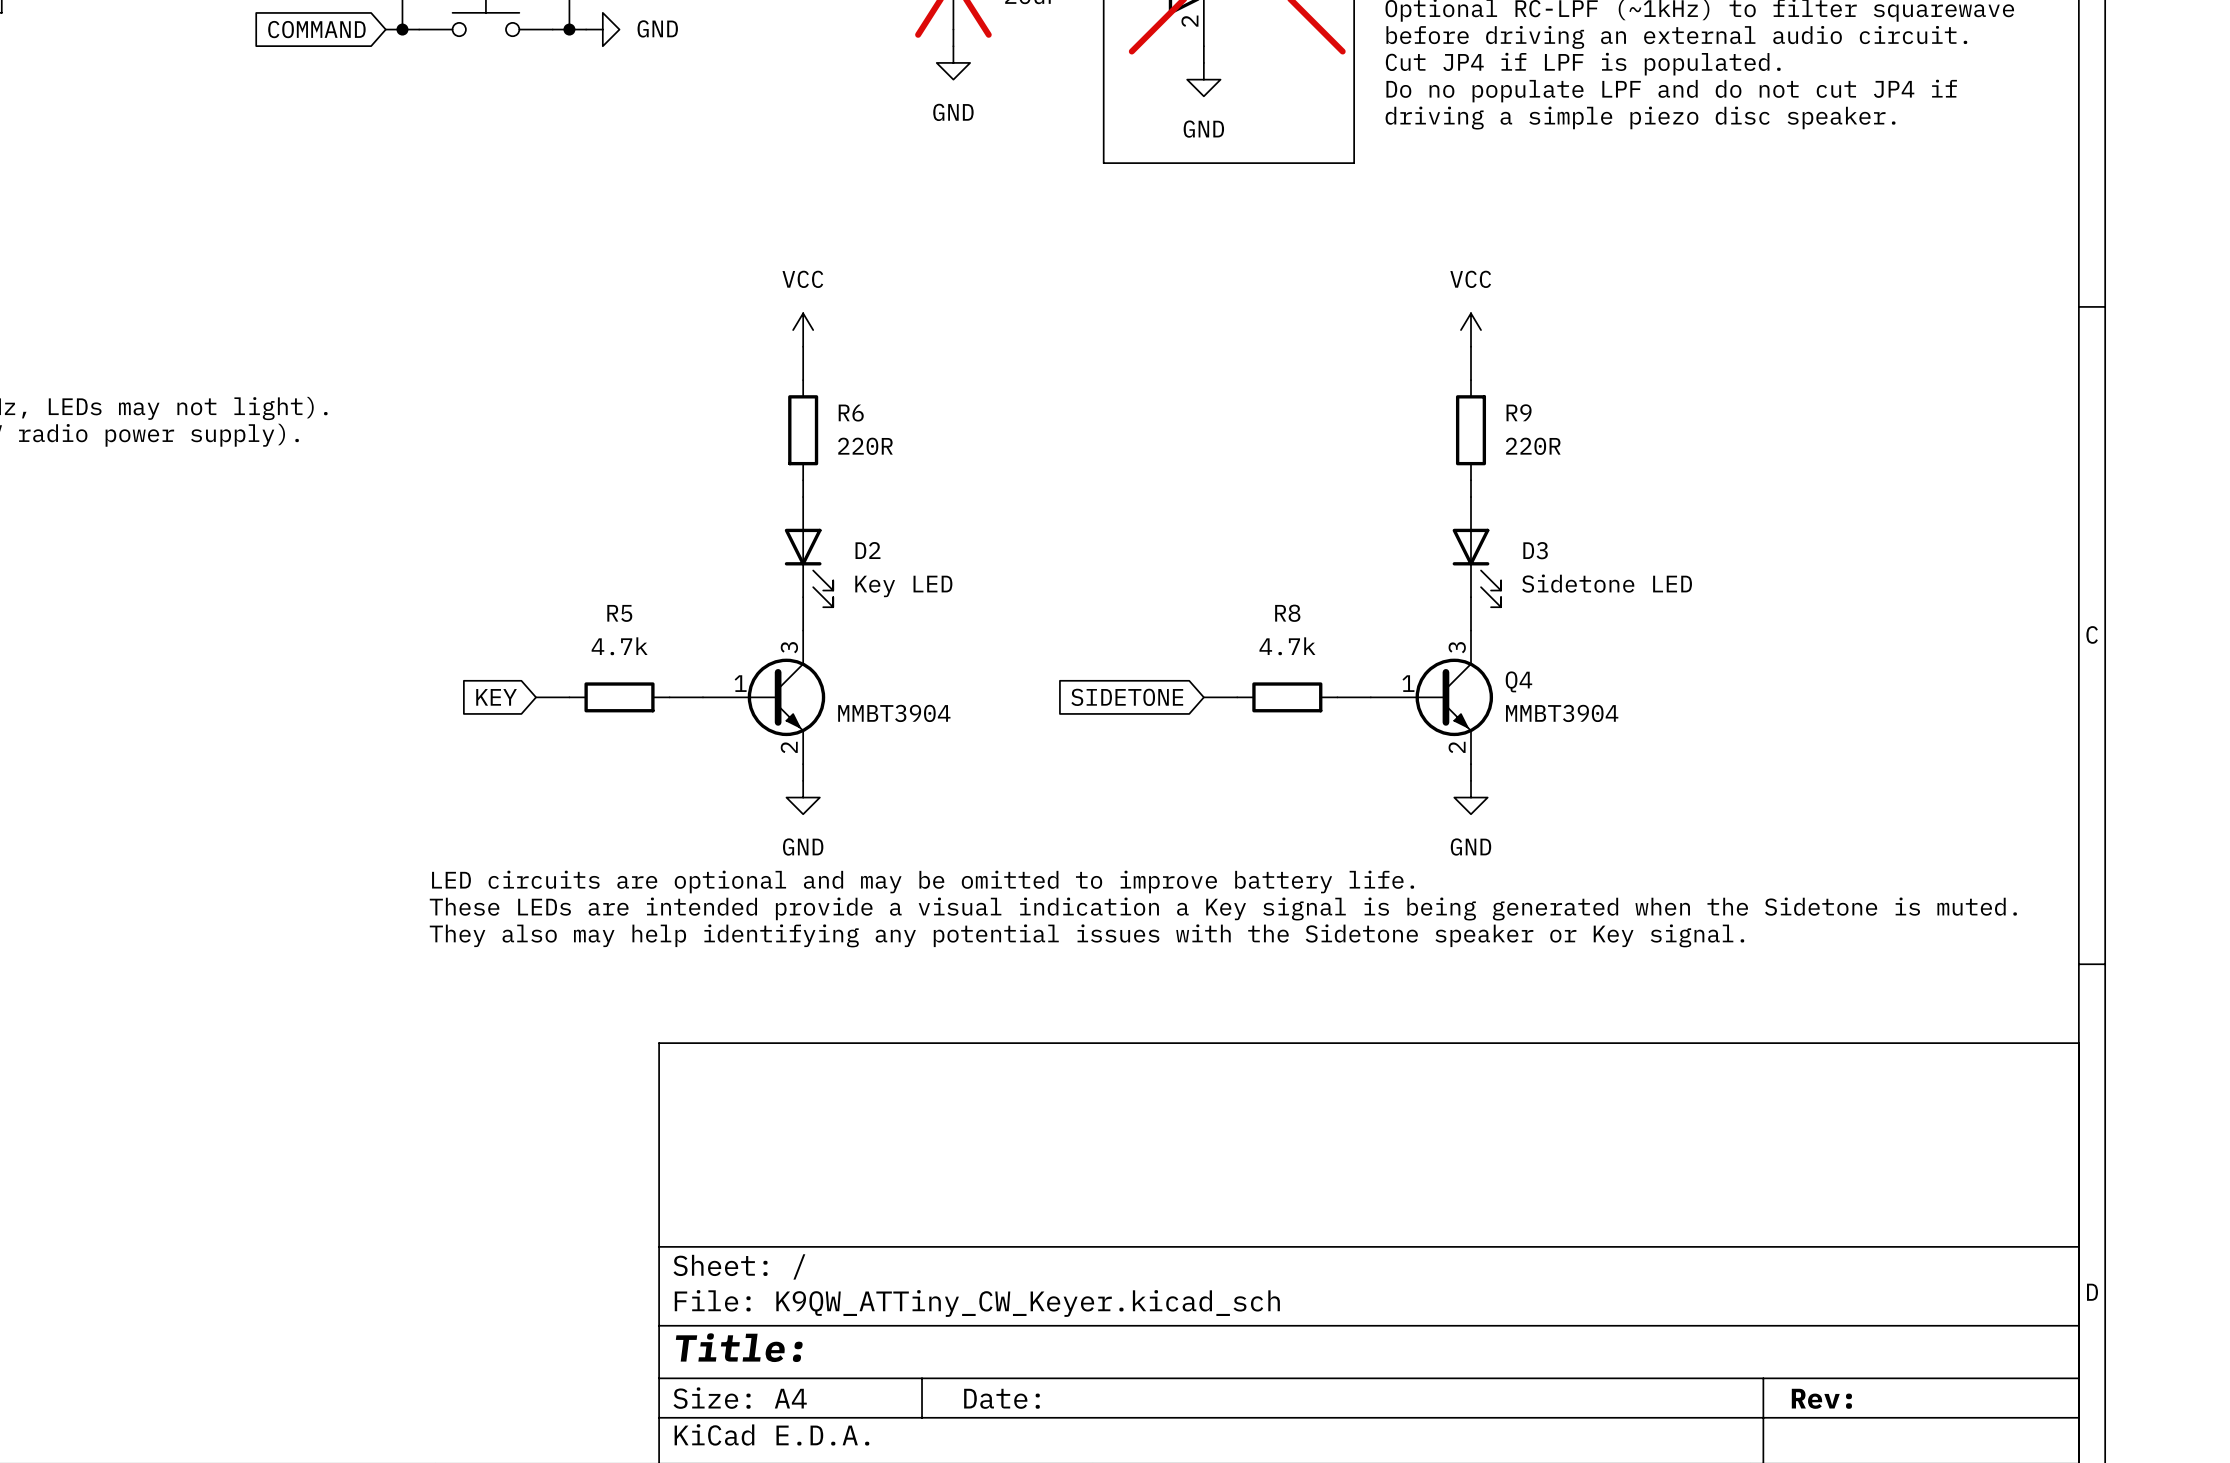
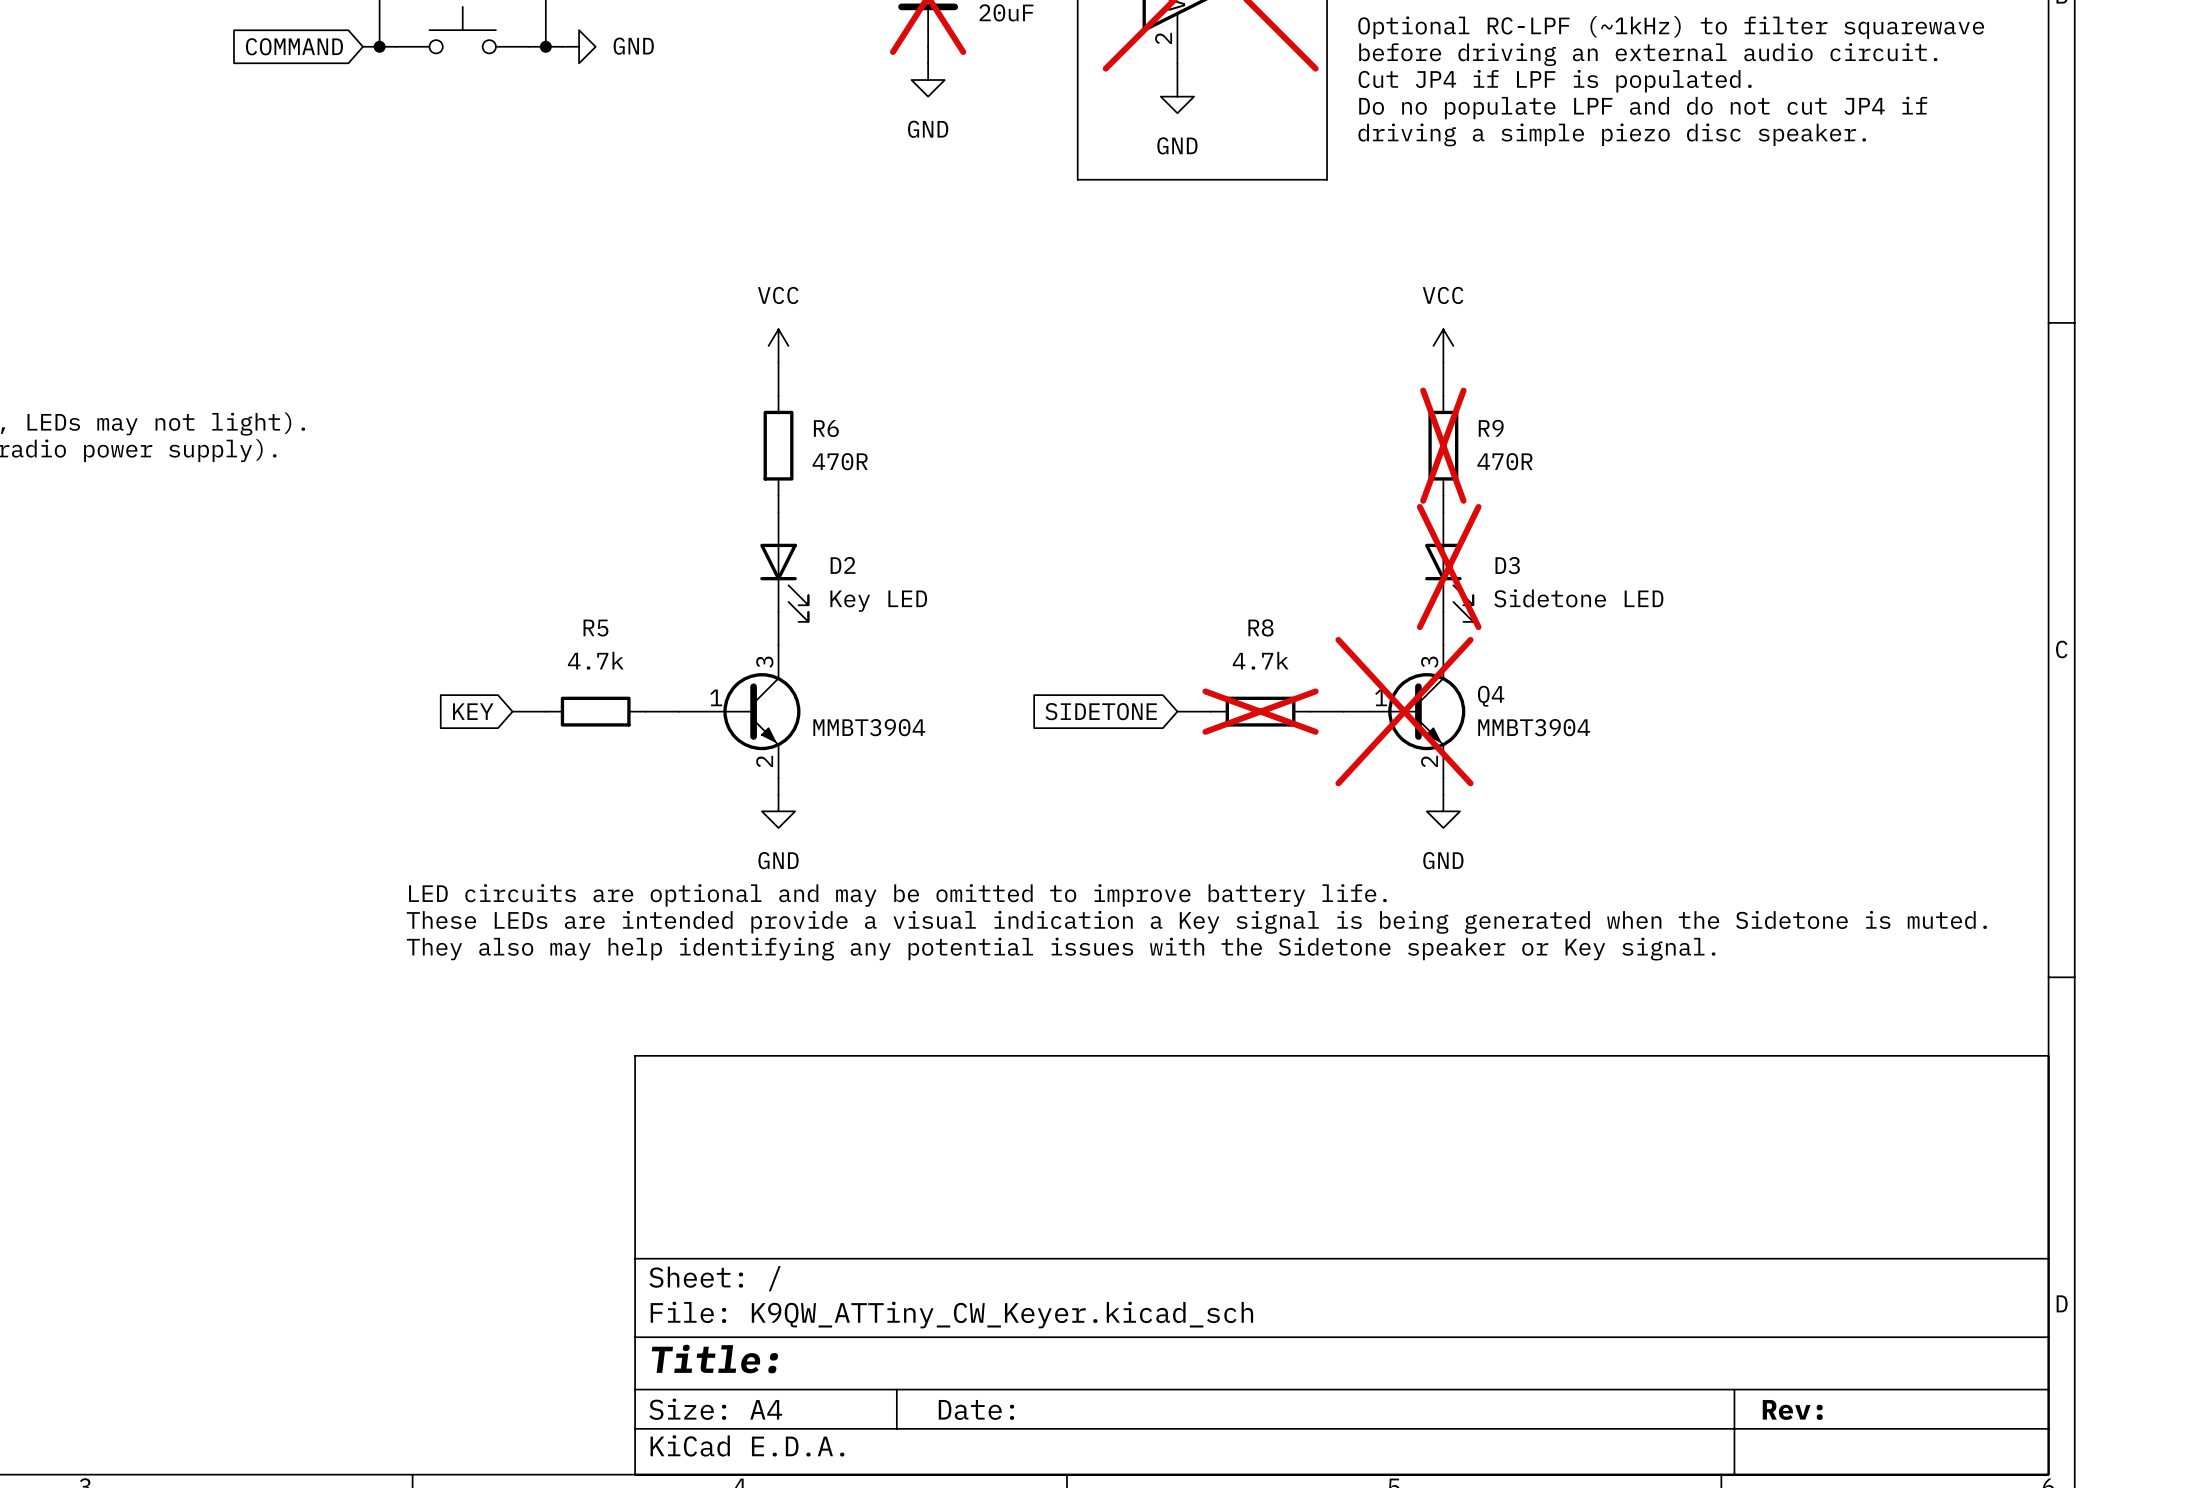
R9 do-not-place cross: none -> (1443, 445)
R6 value: 220R (865, 446) -> 470R (840, 461)
R9 value: 220R (1533, 446) -> 470R (1505, 461)
D3 do-not-place cross: none -> (1449, 567)
R8 do-not-place cross: none -> (1260, 711)
Q4 do-not-place cross: none -> (1404, 711)

